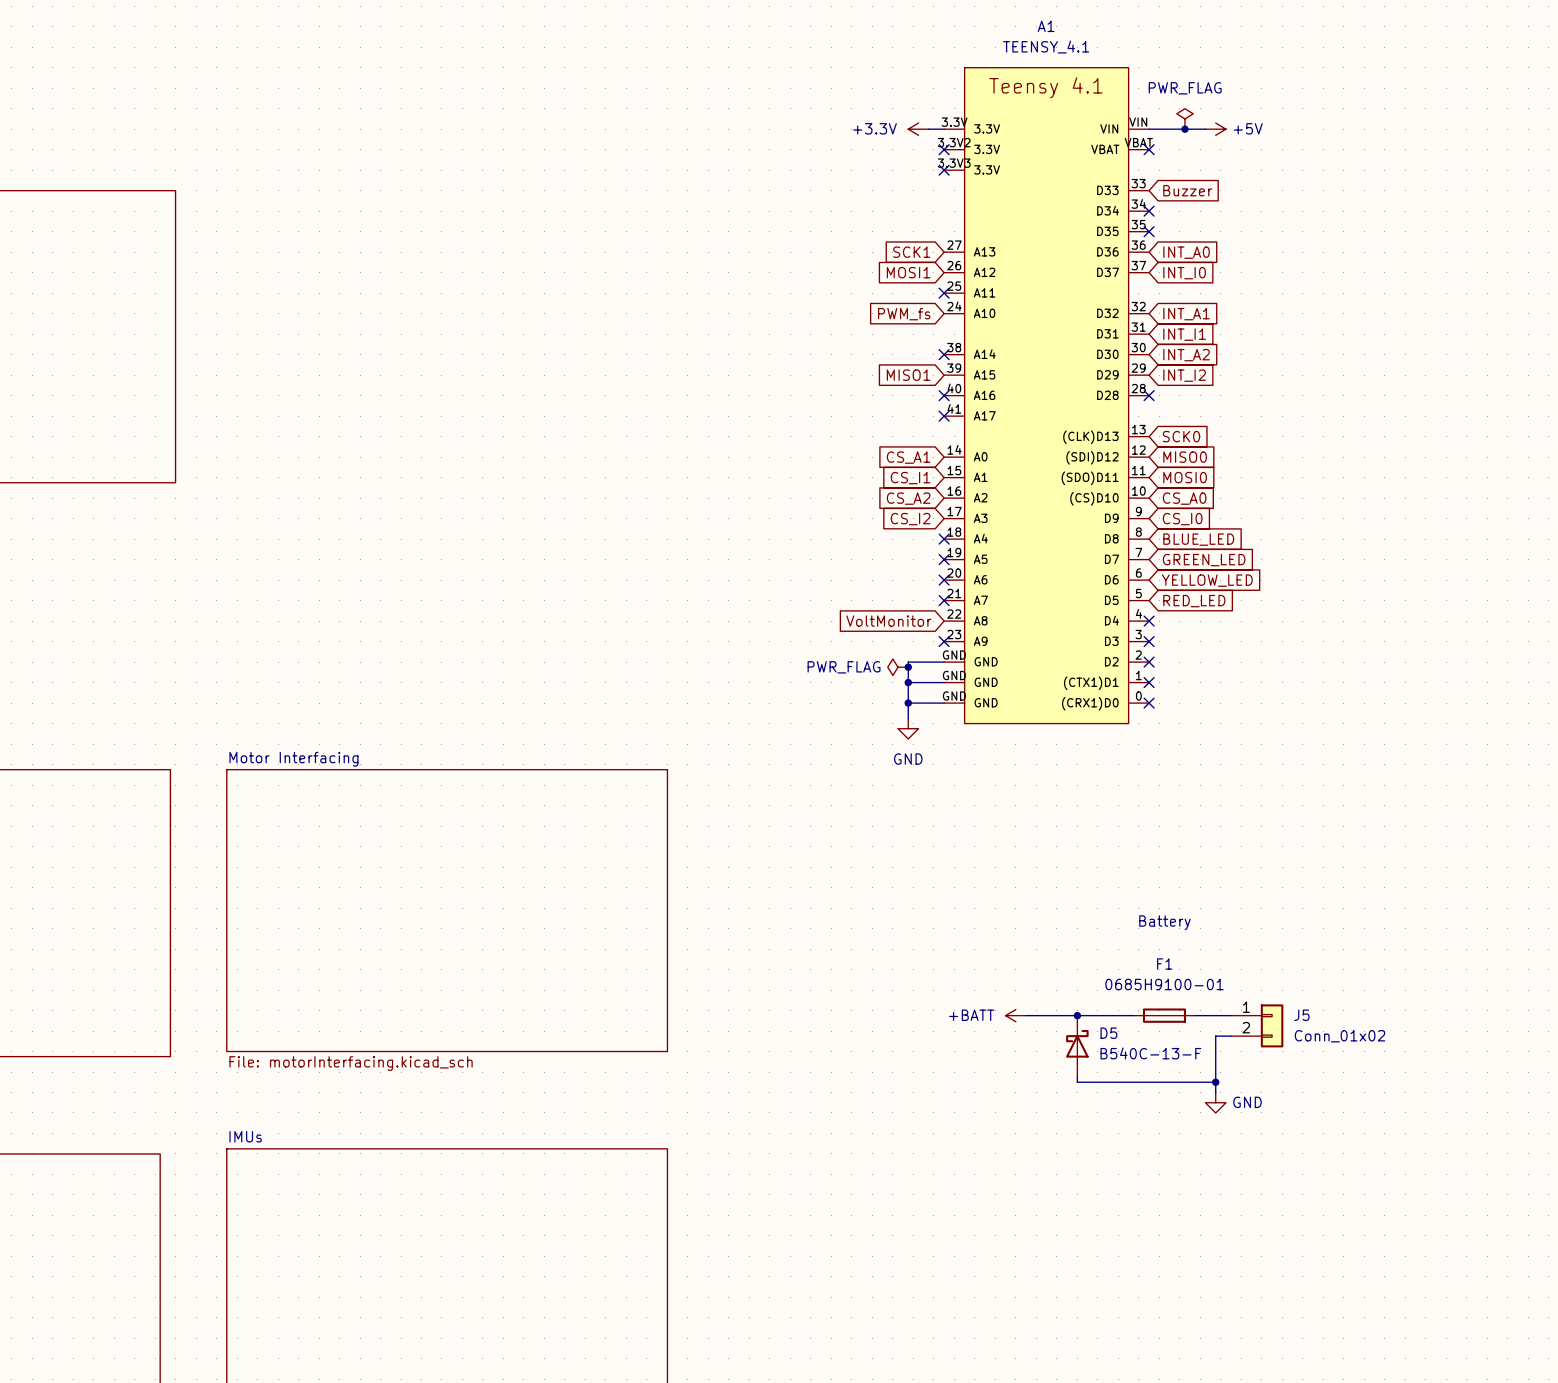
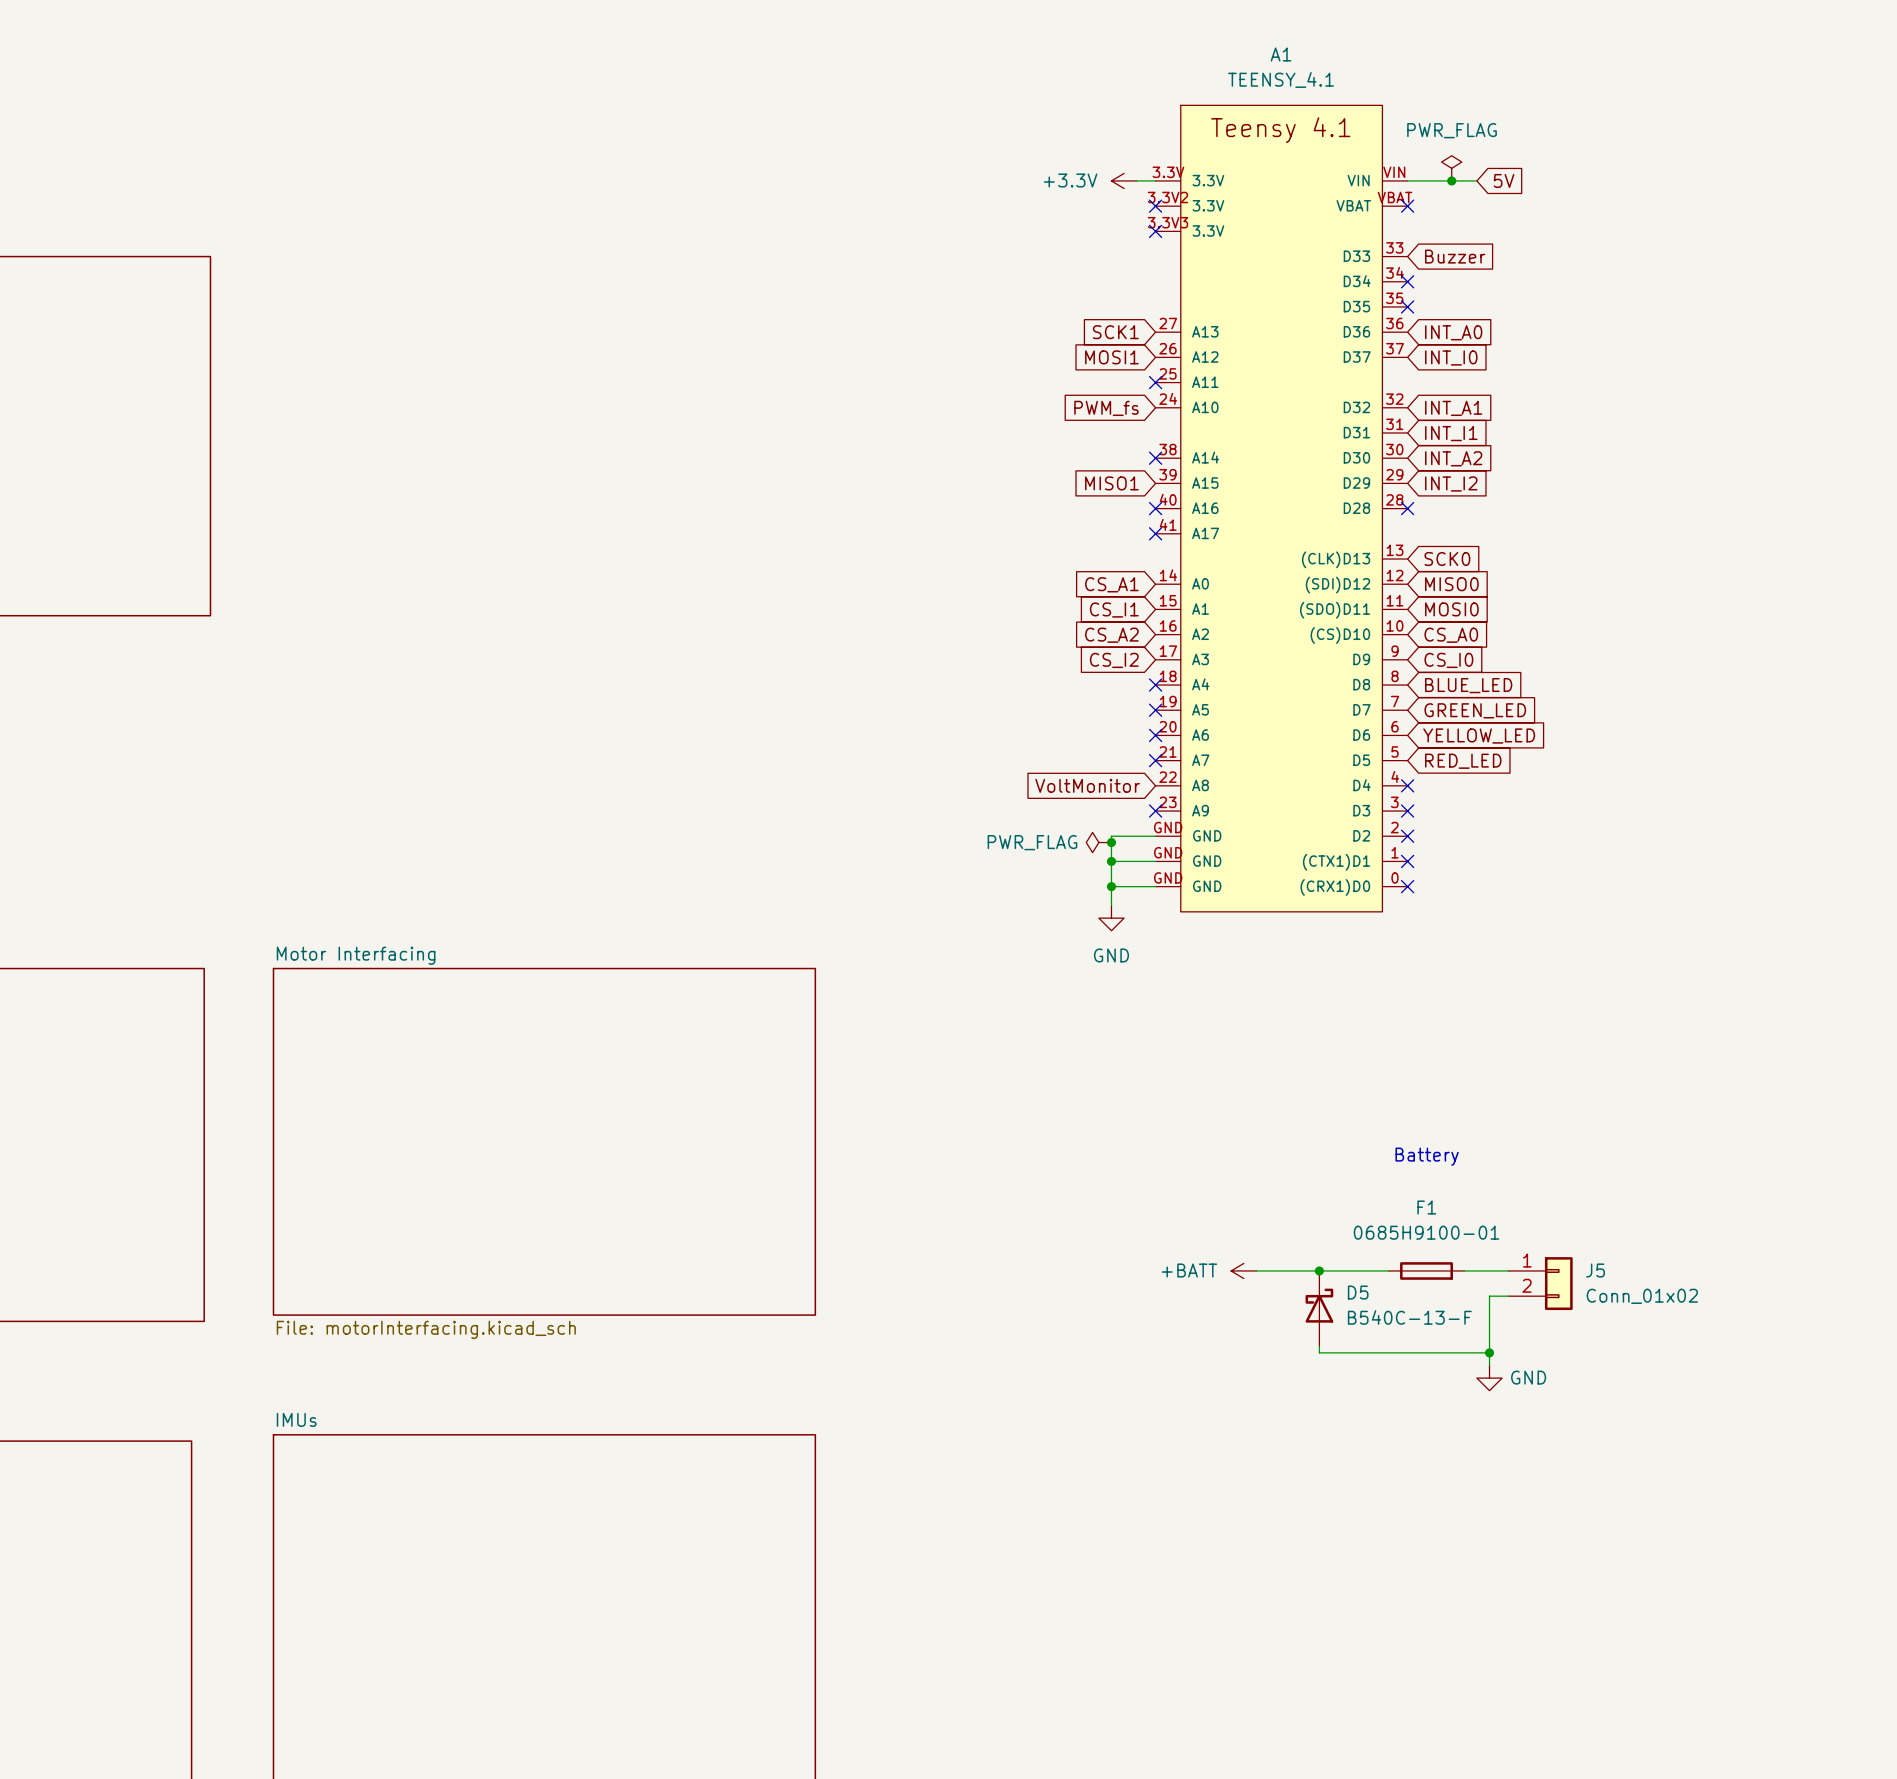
power symbol: +5V (1215, 129) -> none
global label: none -> 5V (1504, 180)

